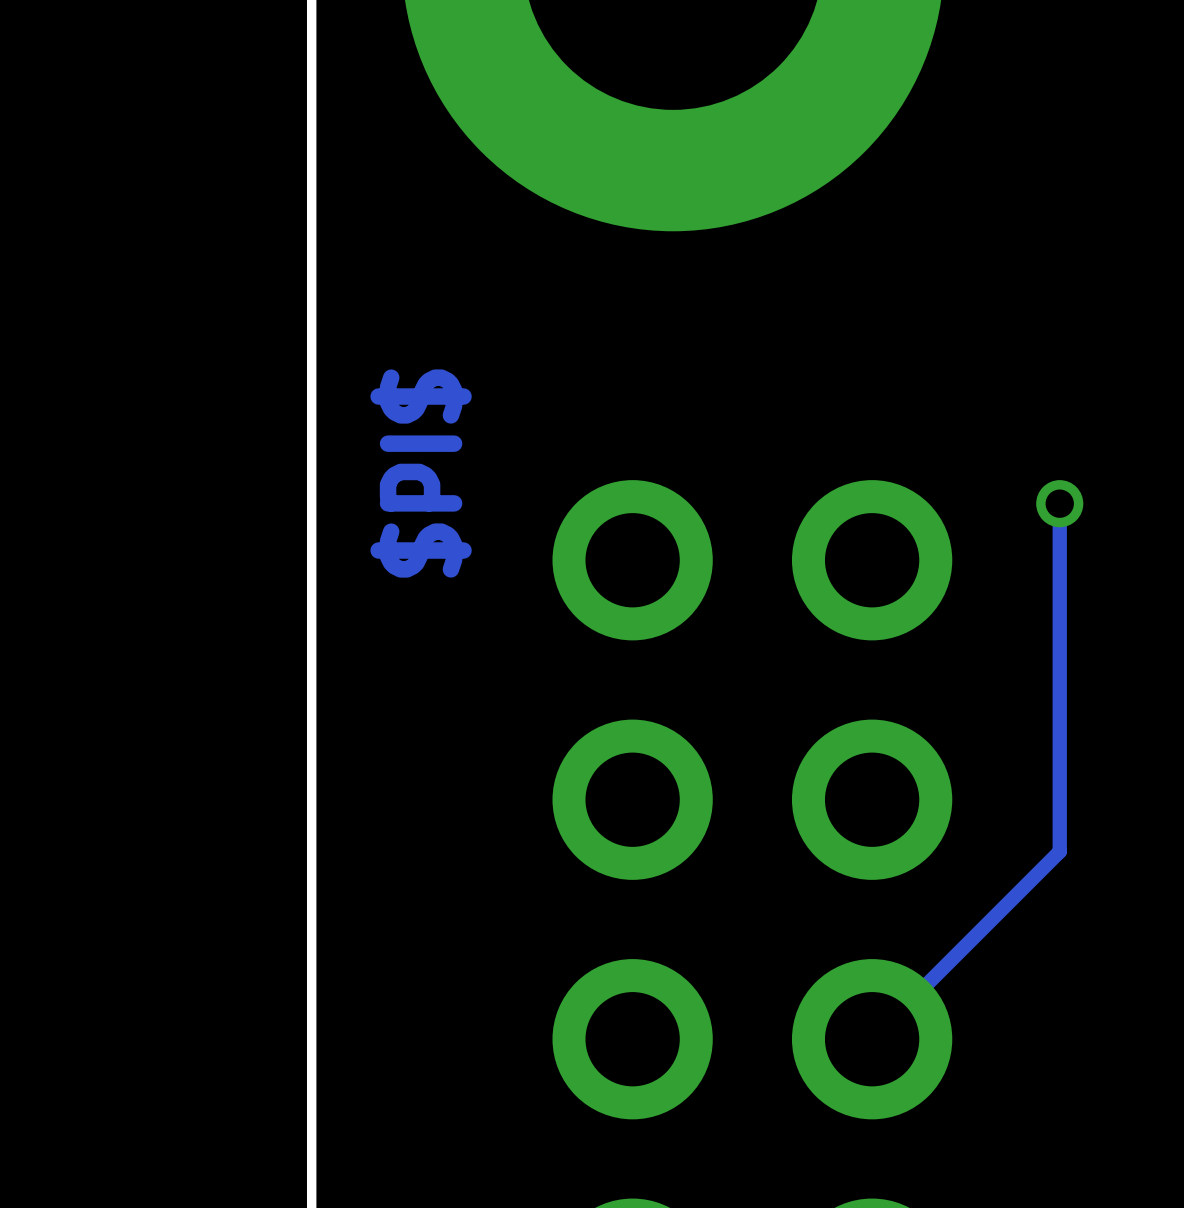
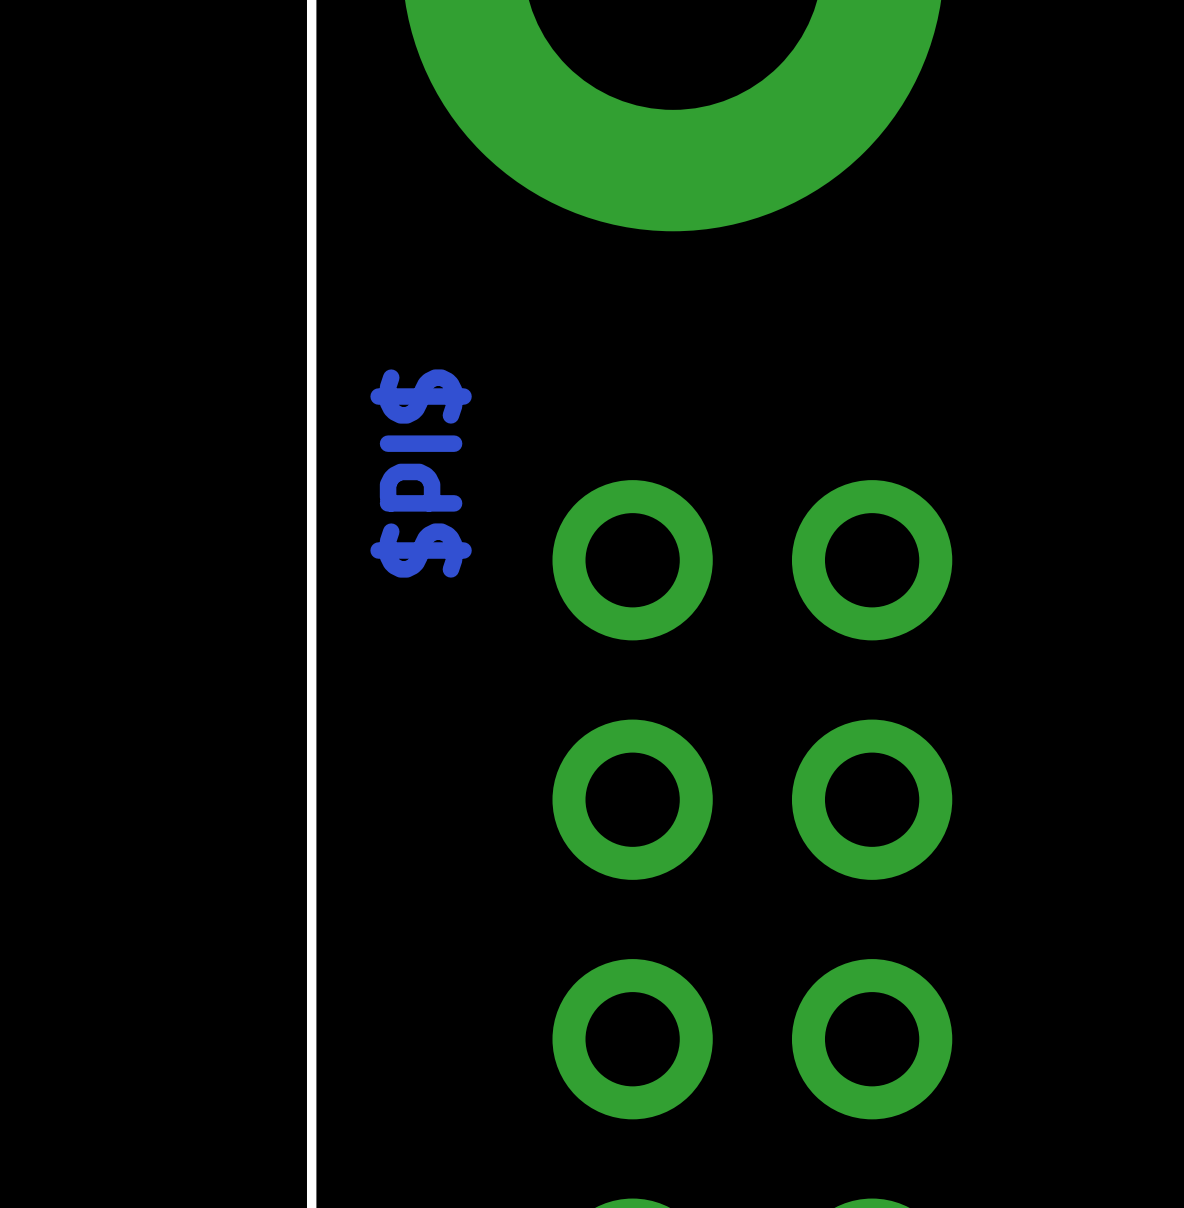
track: (1059, 503) (1059, 851) (872, 1039) -> none
via: (1059, 503) -> none

